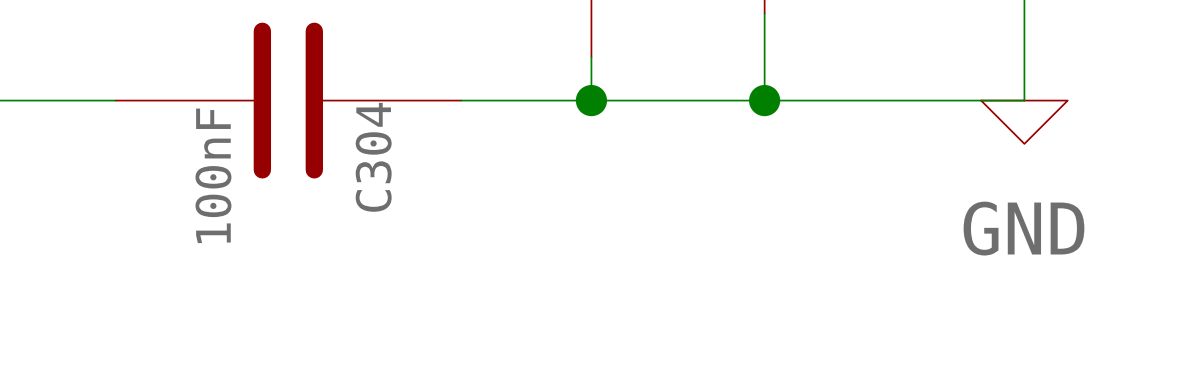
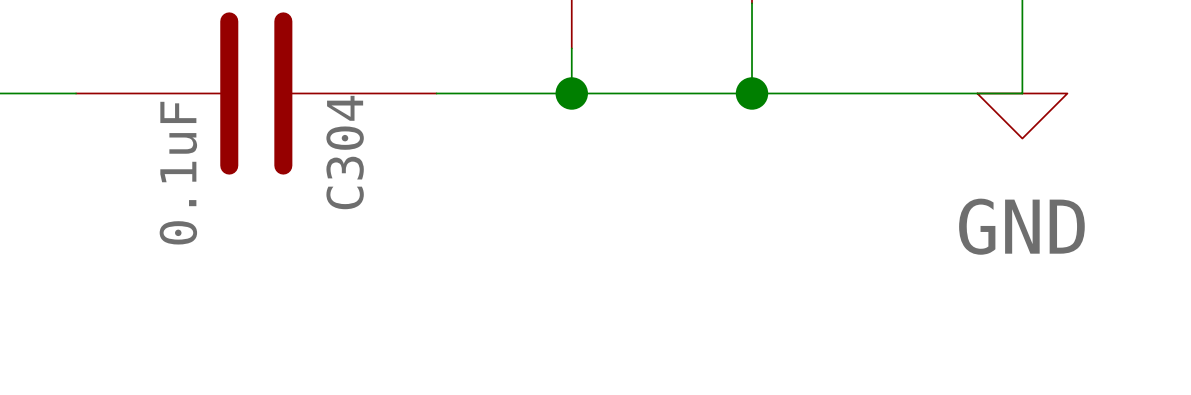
C304 value: 100nF (213, 175) -> 0.1uF (178, 173)

